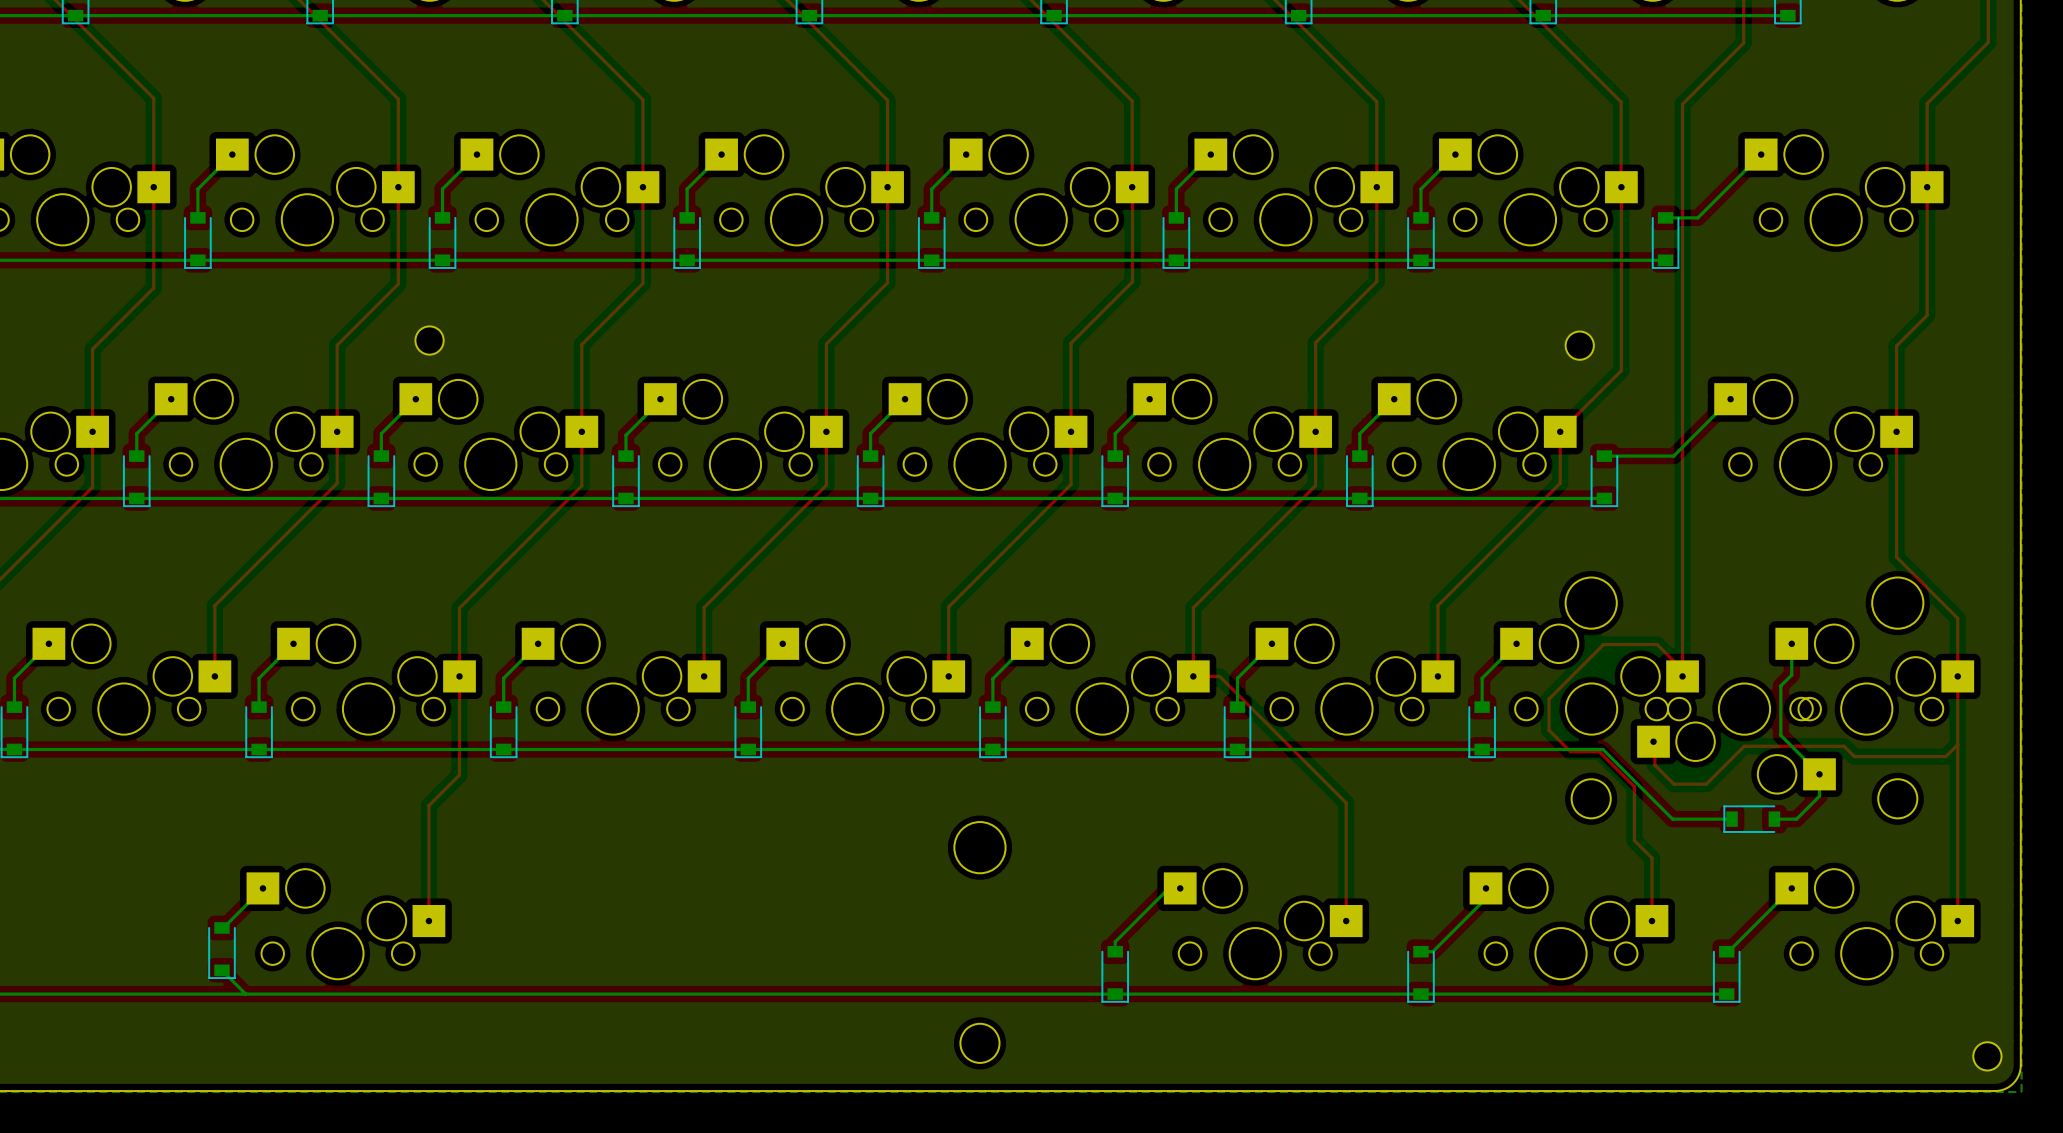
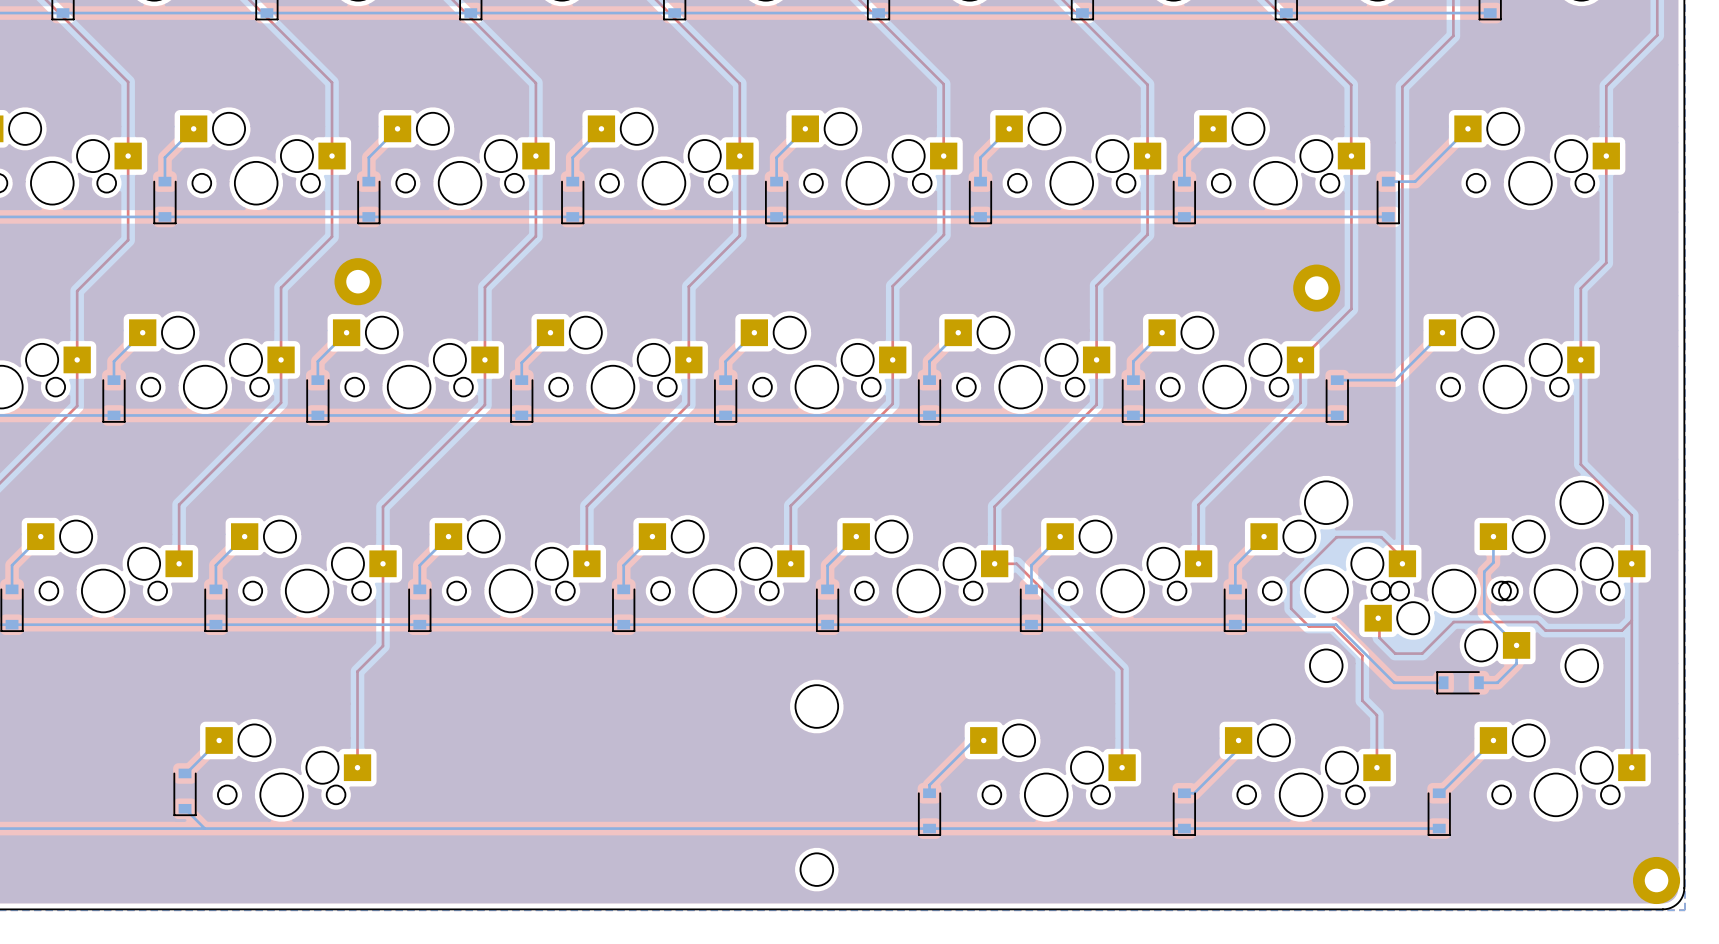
part footprint: [415, 326, 444, 355] -> [334, 258, 382, 306]
part footprint: [1565, 331, 1594, 360] -> [1293, 264, 1341, 312]
part footprint: [1973, 1042, 2002, 1071] -> [1632, 856, 1681, 905]

